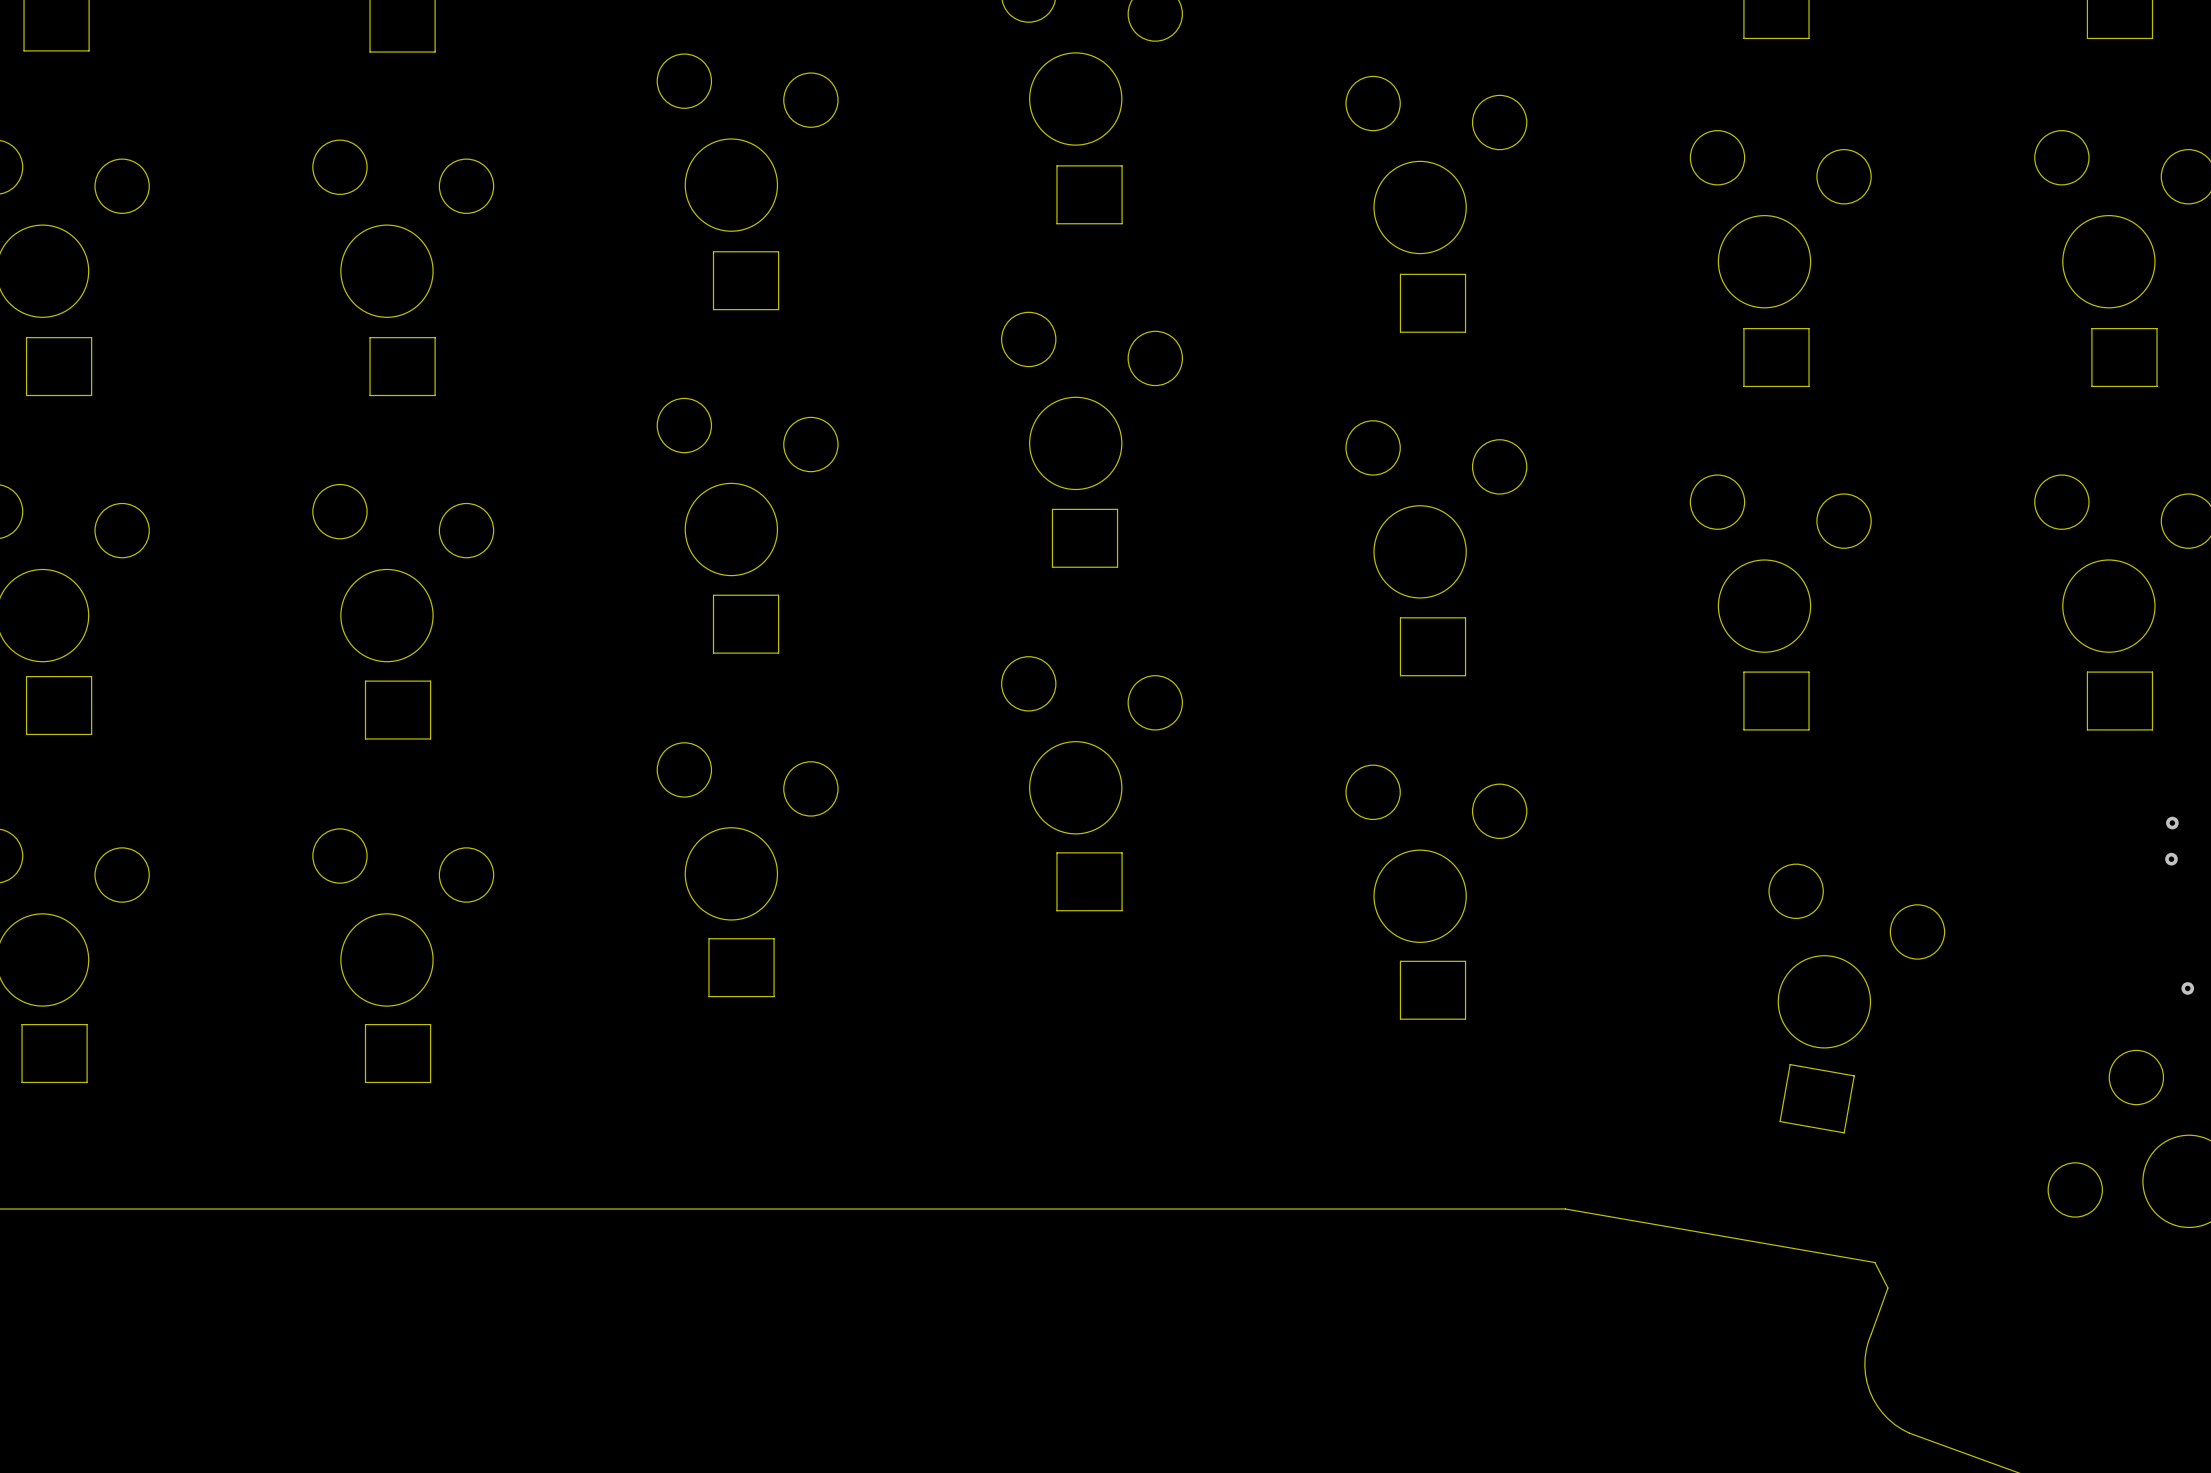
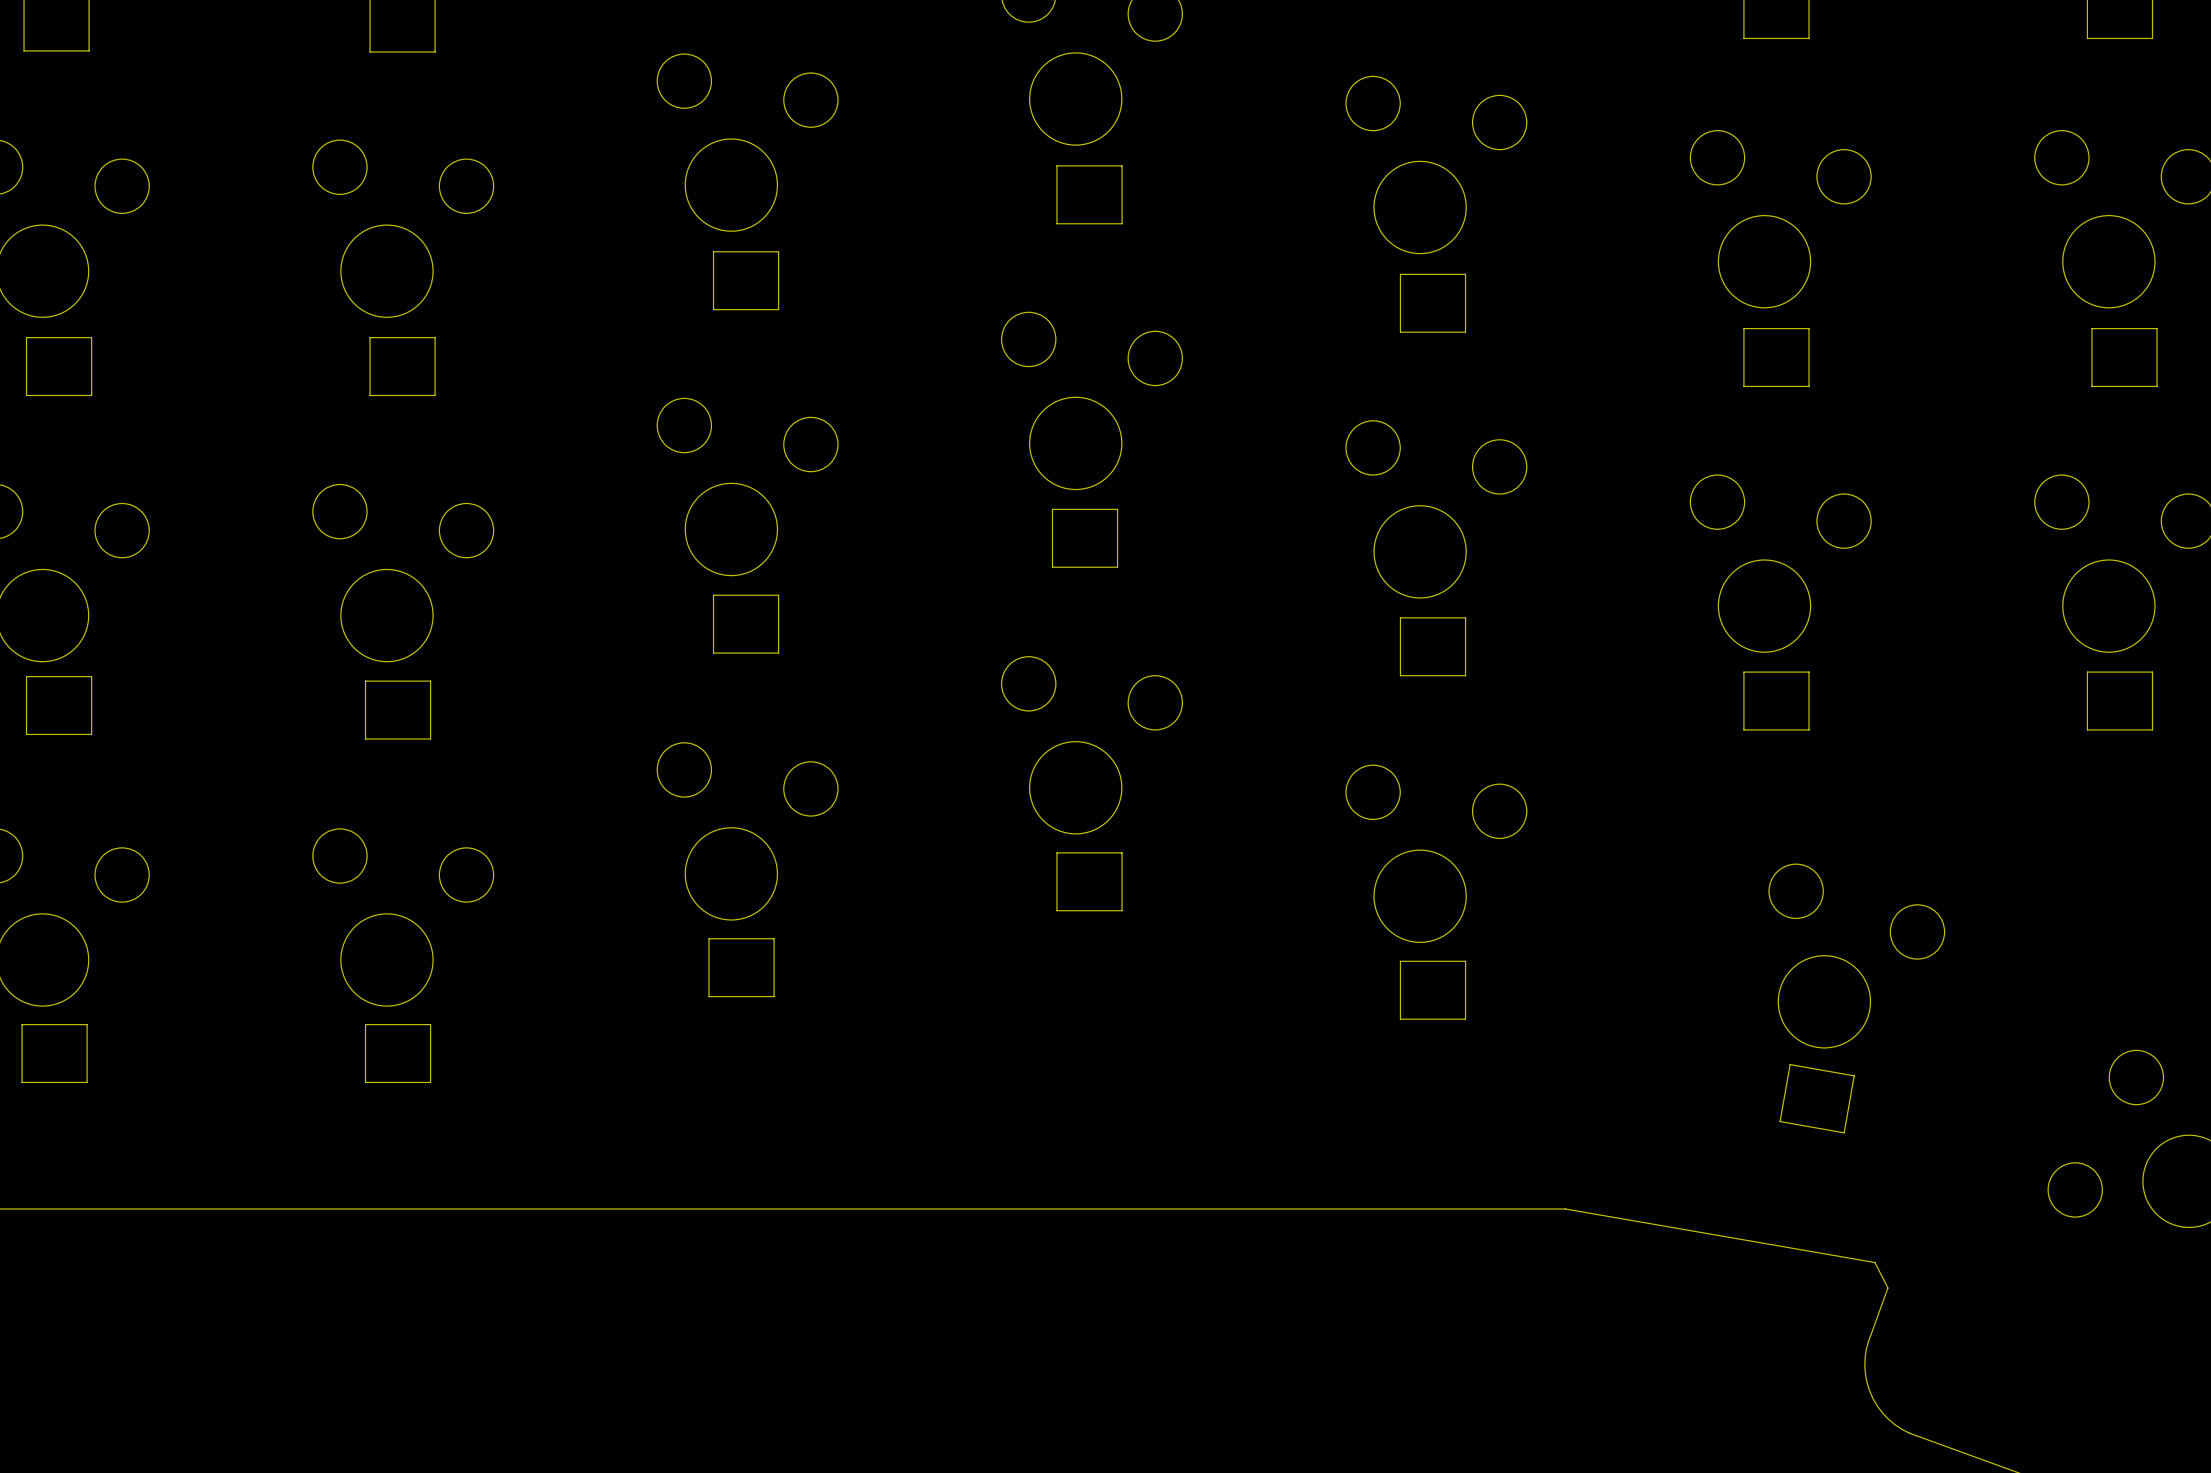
via: (2172, 823) -> none
via: (2171, 859) -> none
via: (2187, 988) -> none

